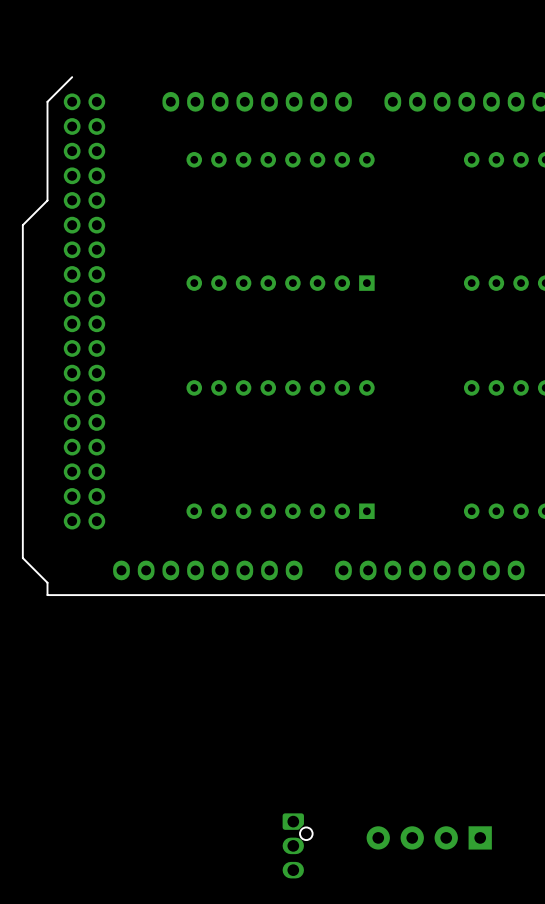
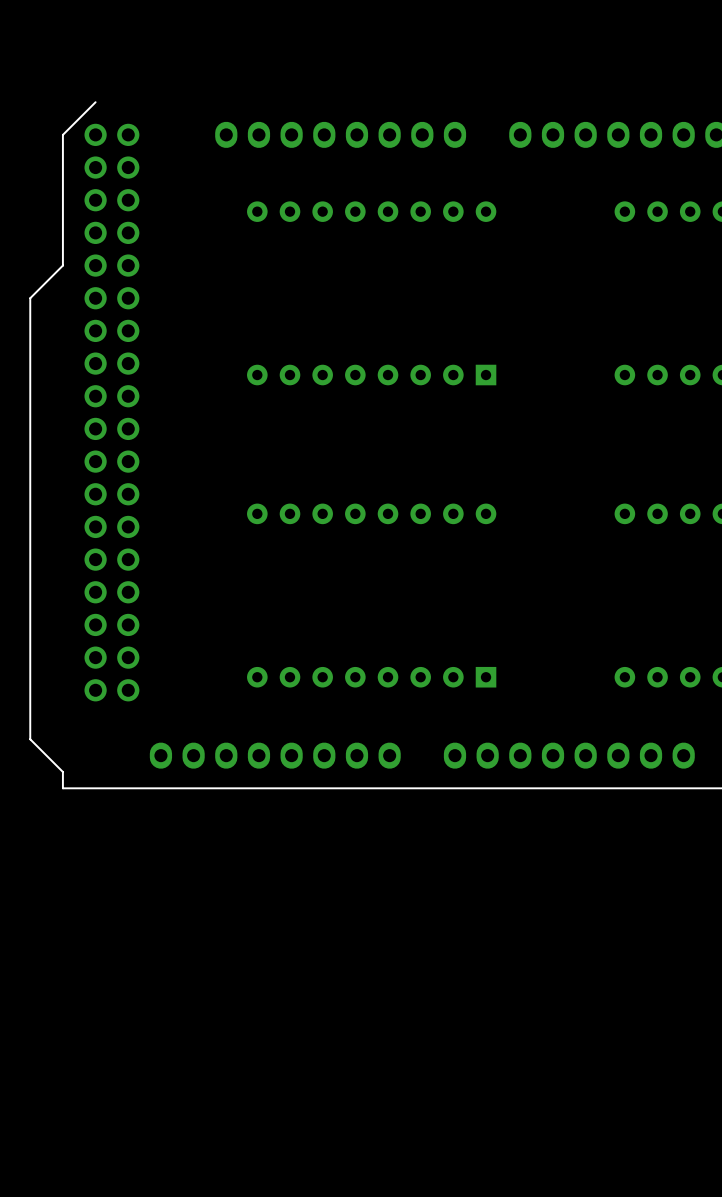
part: (429, 837) -> none
part: (297, 845) -> none

